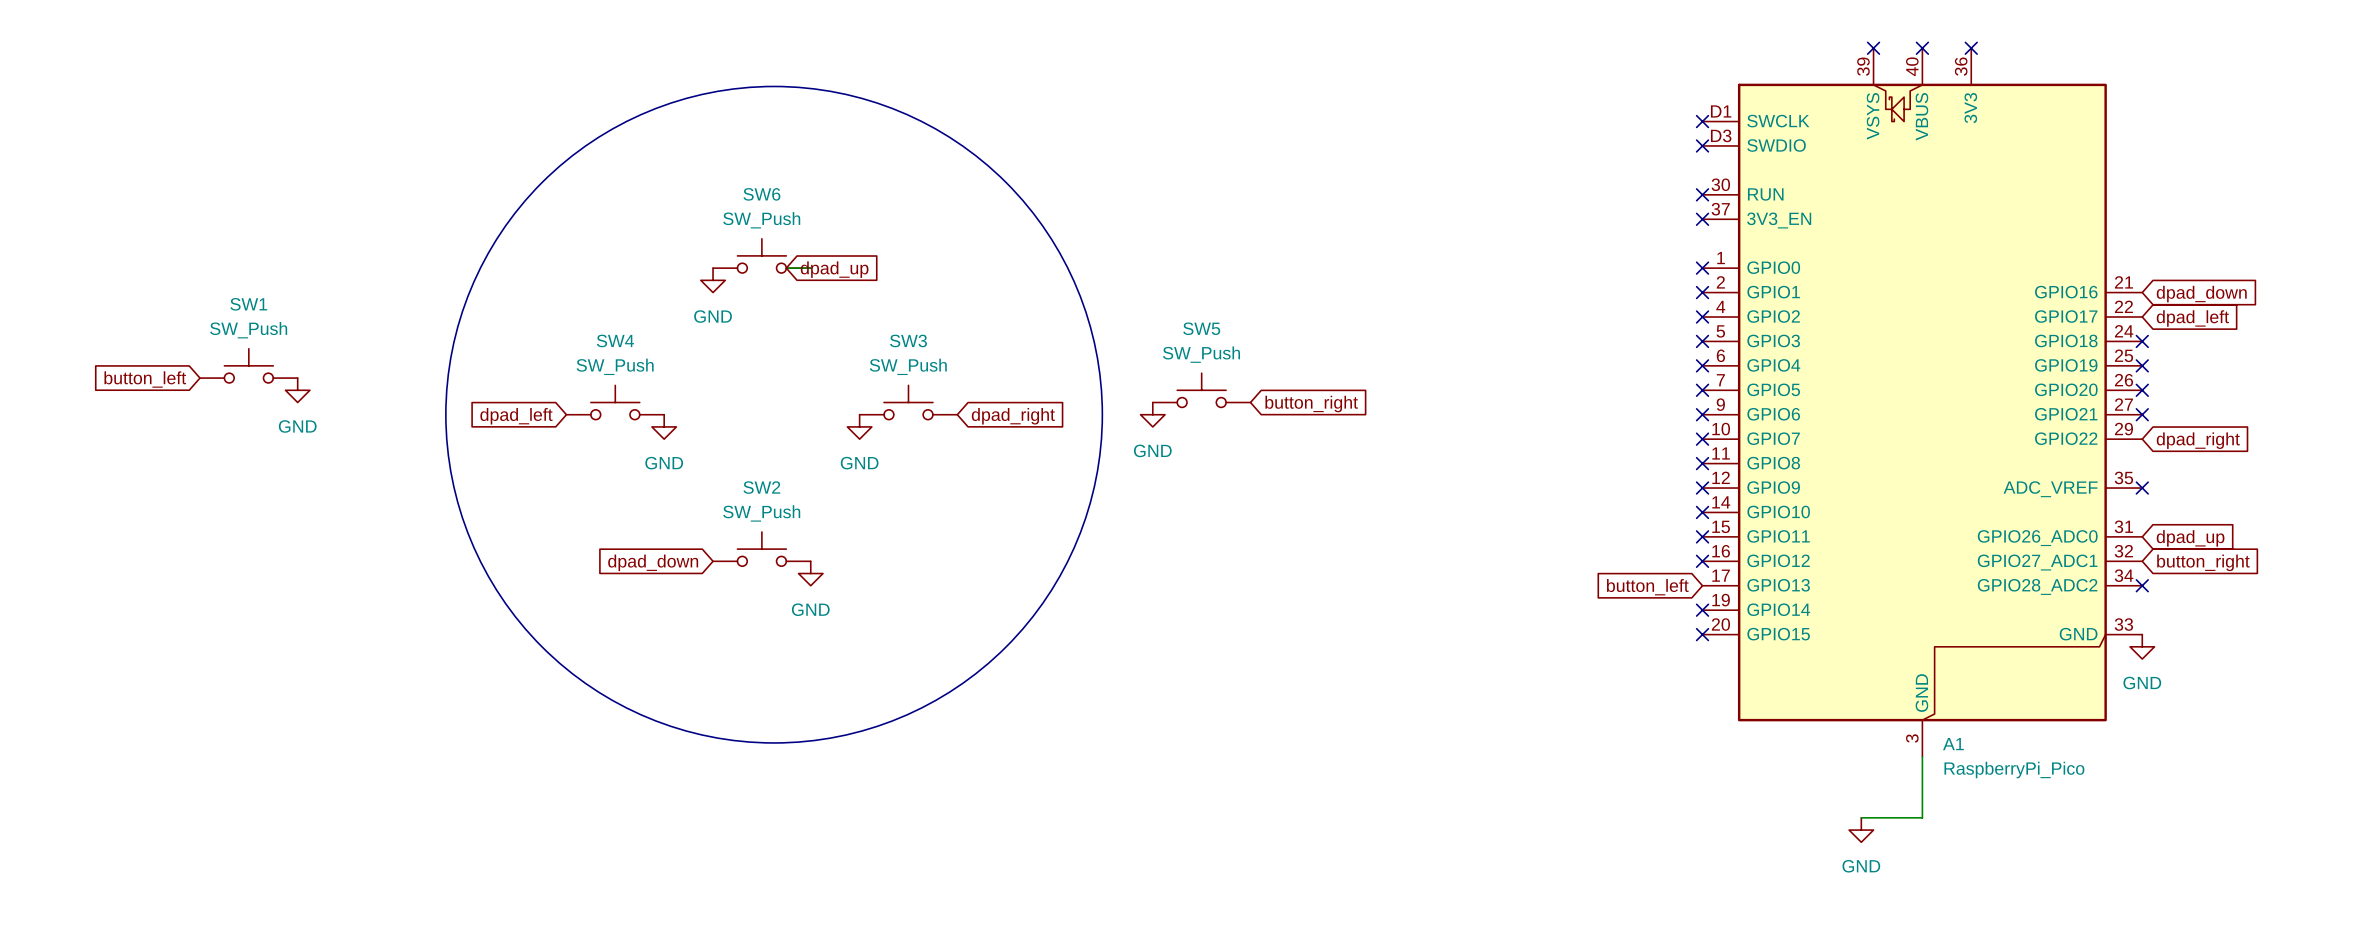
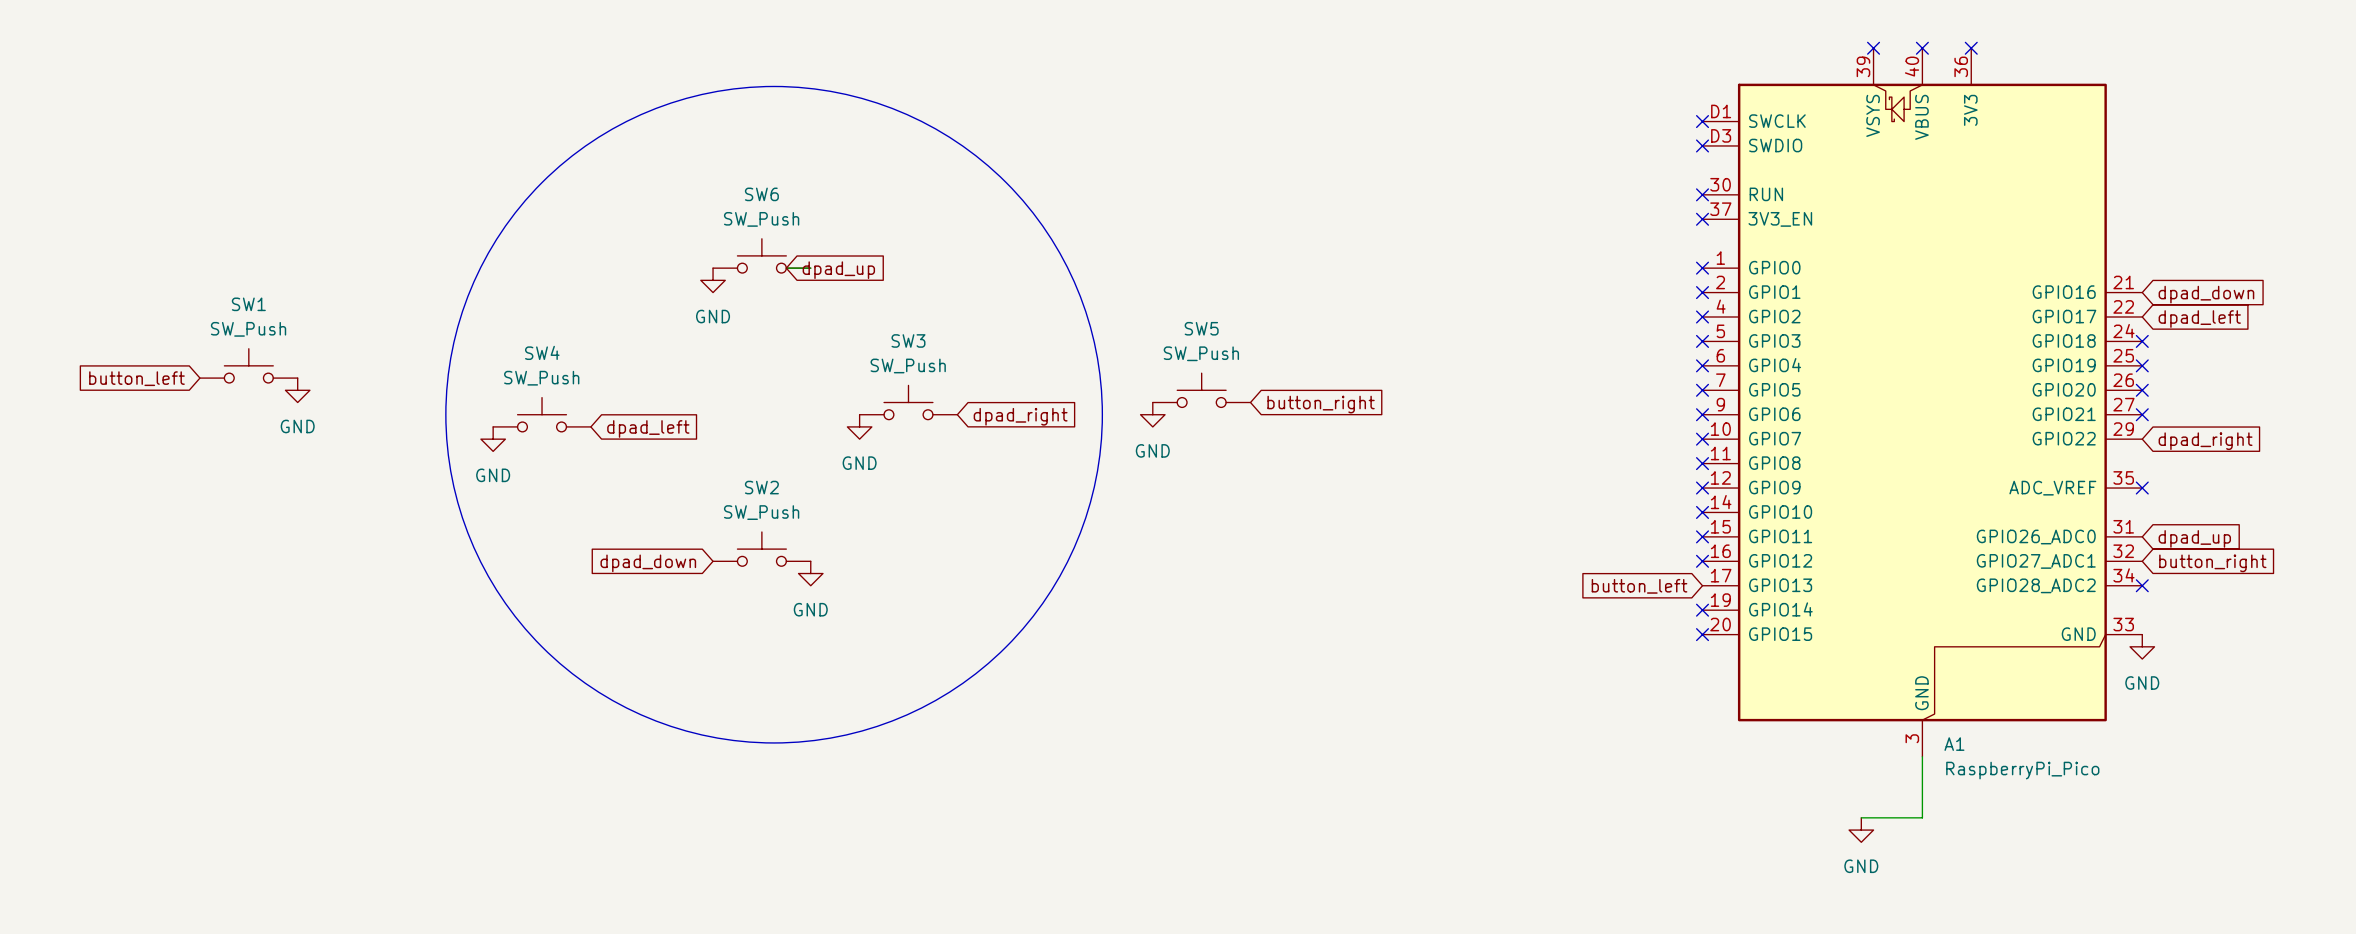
SW4 position: (615, 402) -> (542, 414)
global label rotation: 0° (516, 416) -> 180° (648, 428)
global label position: dpad_left (516, 416) -> dpad_left (648, 428)
power symbol position: GND (664, 426) -> GND (493, 439)

